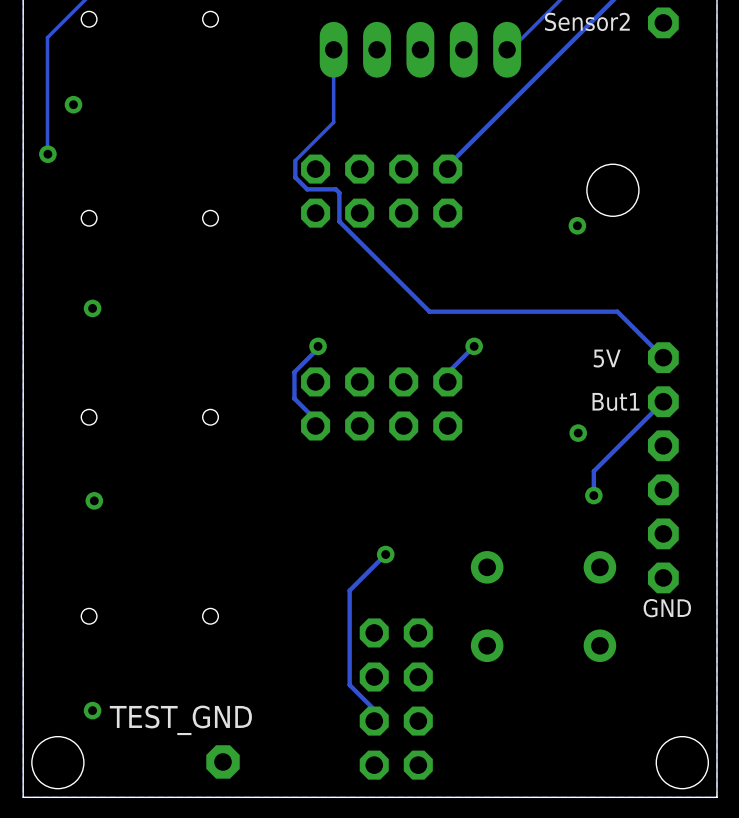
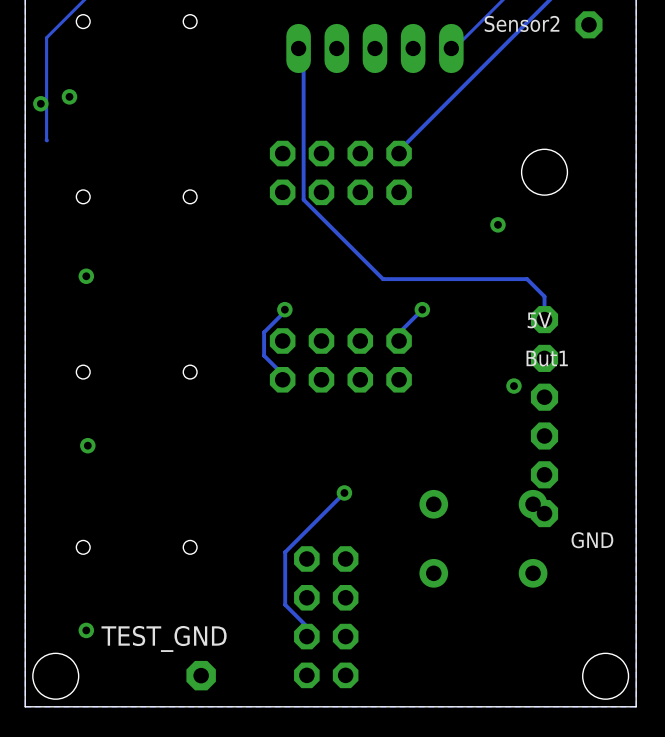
track: (333, 49) (333, 122) (295, 160) (295, 177) (307, 189) (335, 189) (339, 192) -> (298, 48) (303, 53) (303, 174)
via position: (47, 154) -> (40, 103)
via position: (577, 225) -> (497, 224)
track: (593, 311) (617, 311) (663, 357) -> (527, 279) (544, 296) (544, 319)
track: (663, 401) (593, 471) (593, 495) -> none
part position: (663, 467) -> (544, 416)
via: (593, 495) -> none
track: (349, 590) (349, 685) (374, 709) (374, 721) -> (312, 524) (285, 552) (285, 604) (306, 626) (306, 636)
part position: (396, 699) -> (326, 617)

